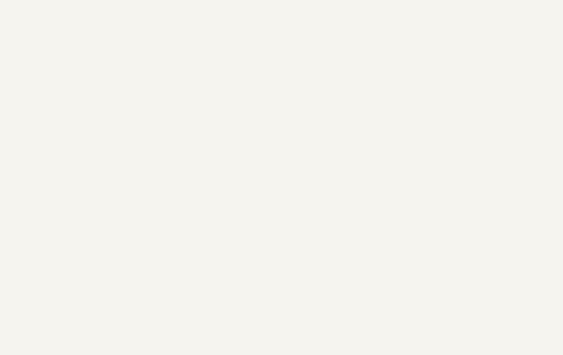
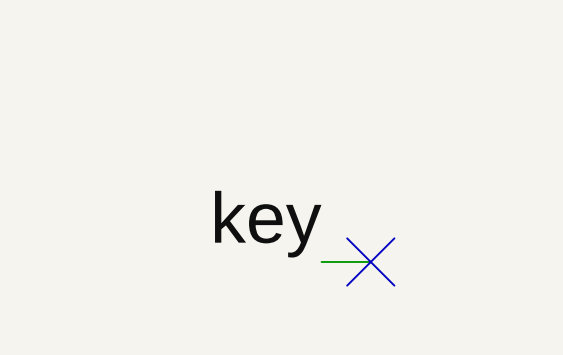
label: none -> key (268, 224)
wire: none -> (321, 261) (370, 261)
no-connect mark: none -> (370, 261)

